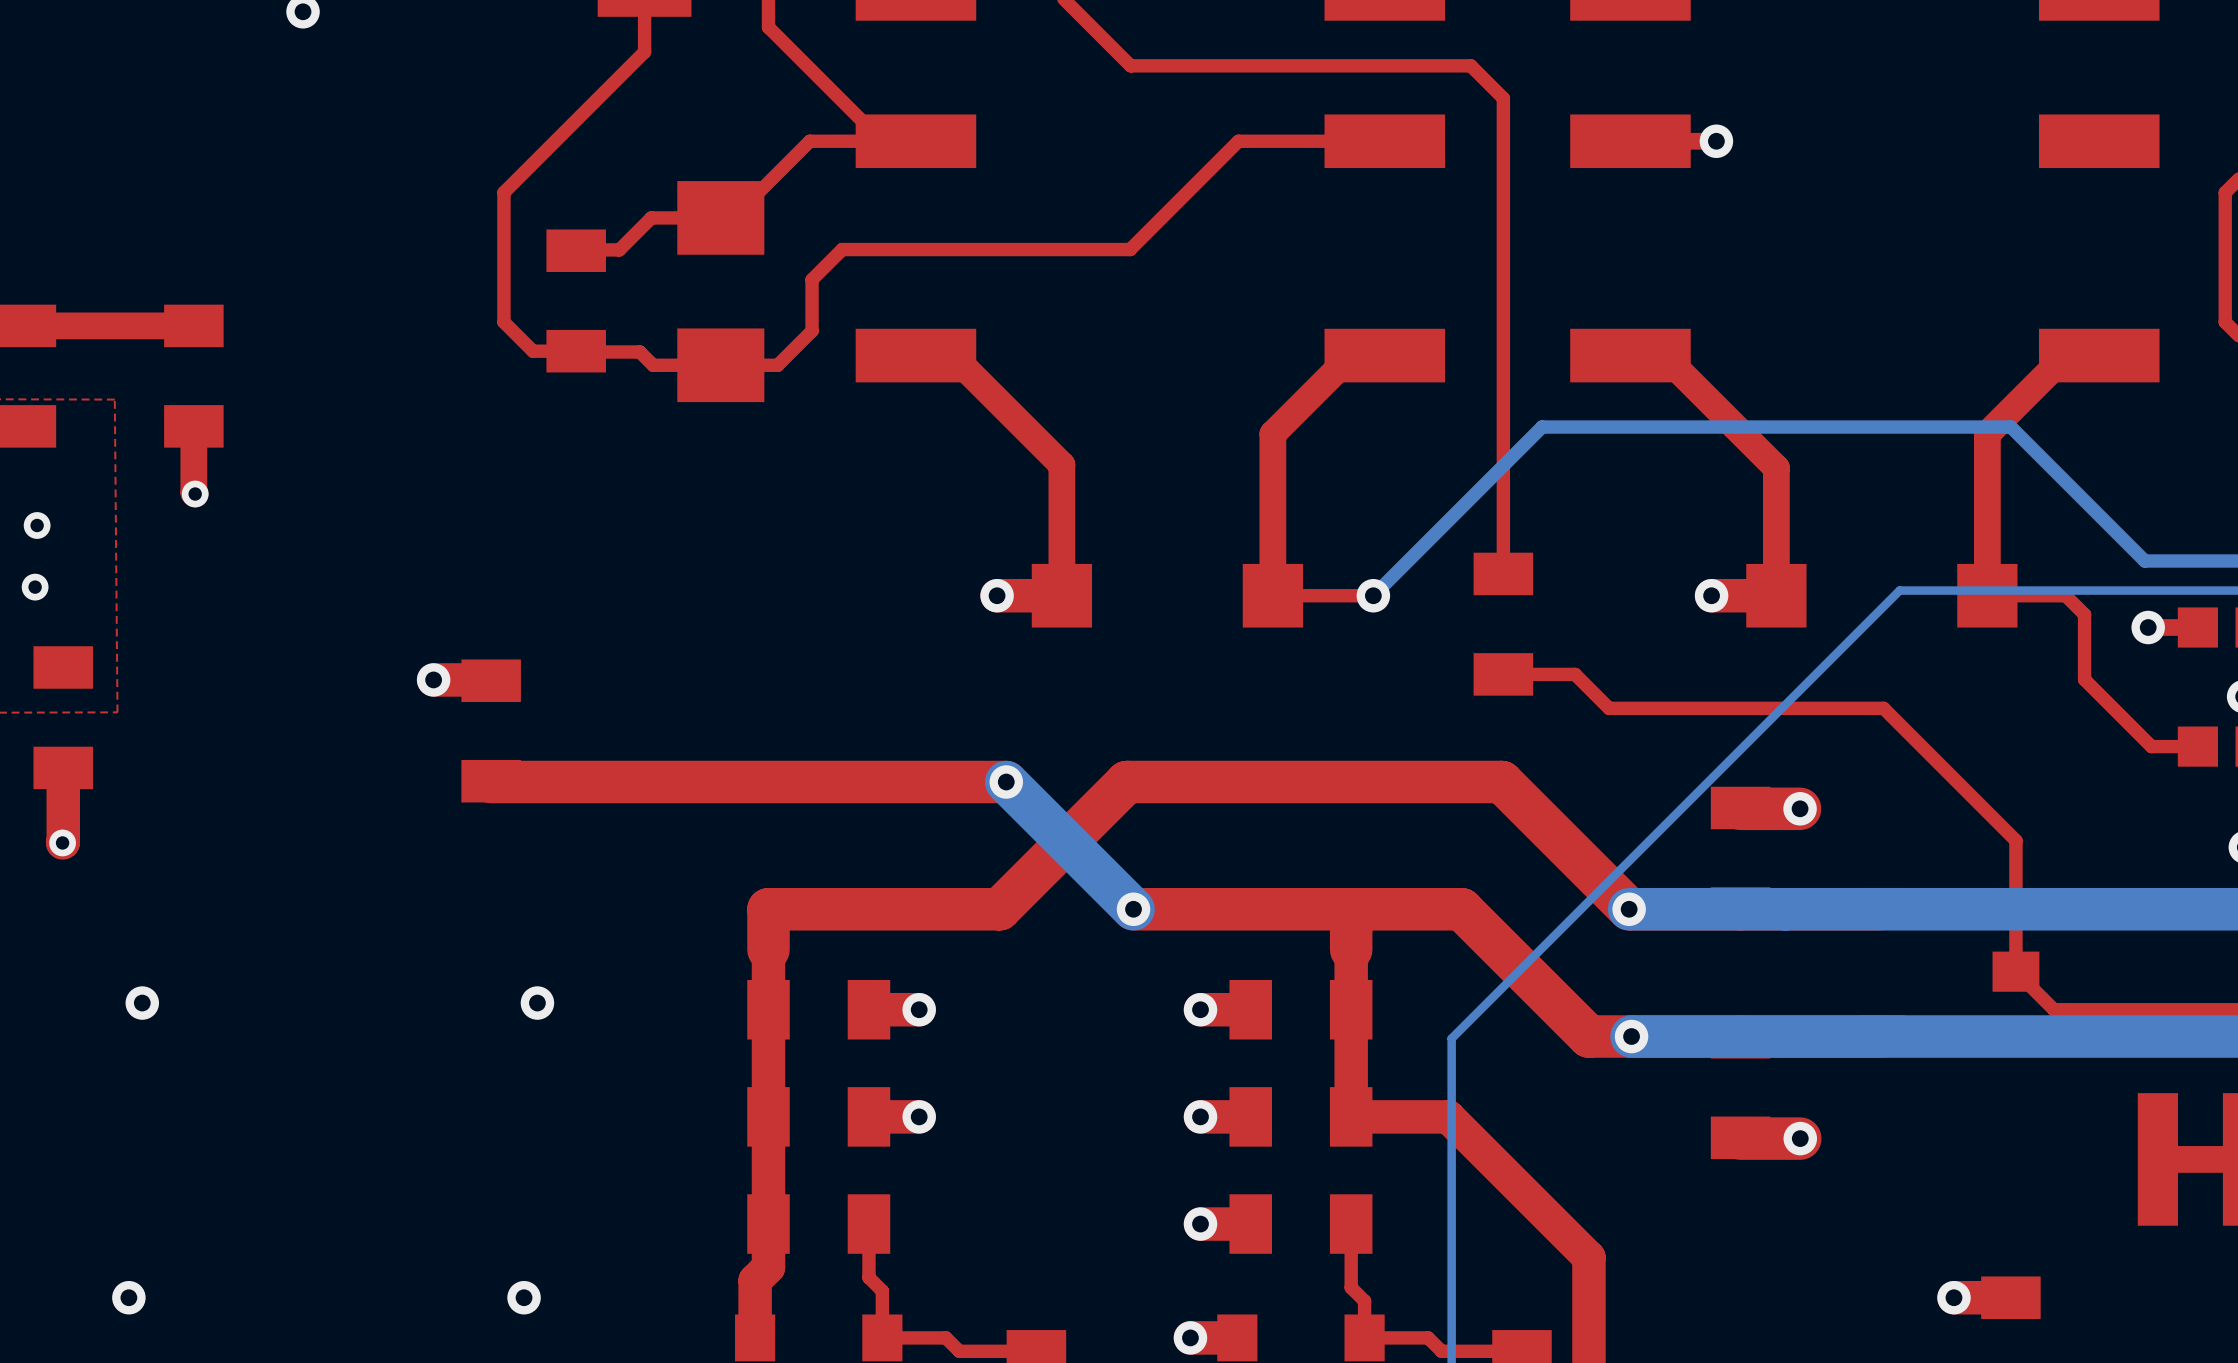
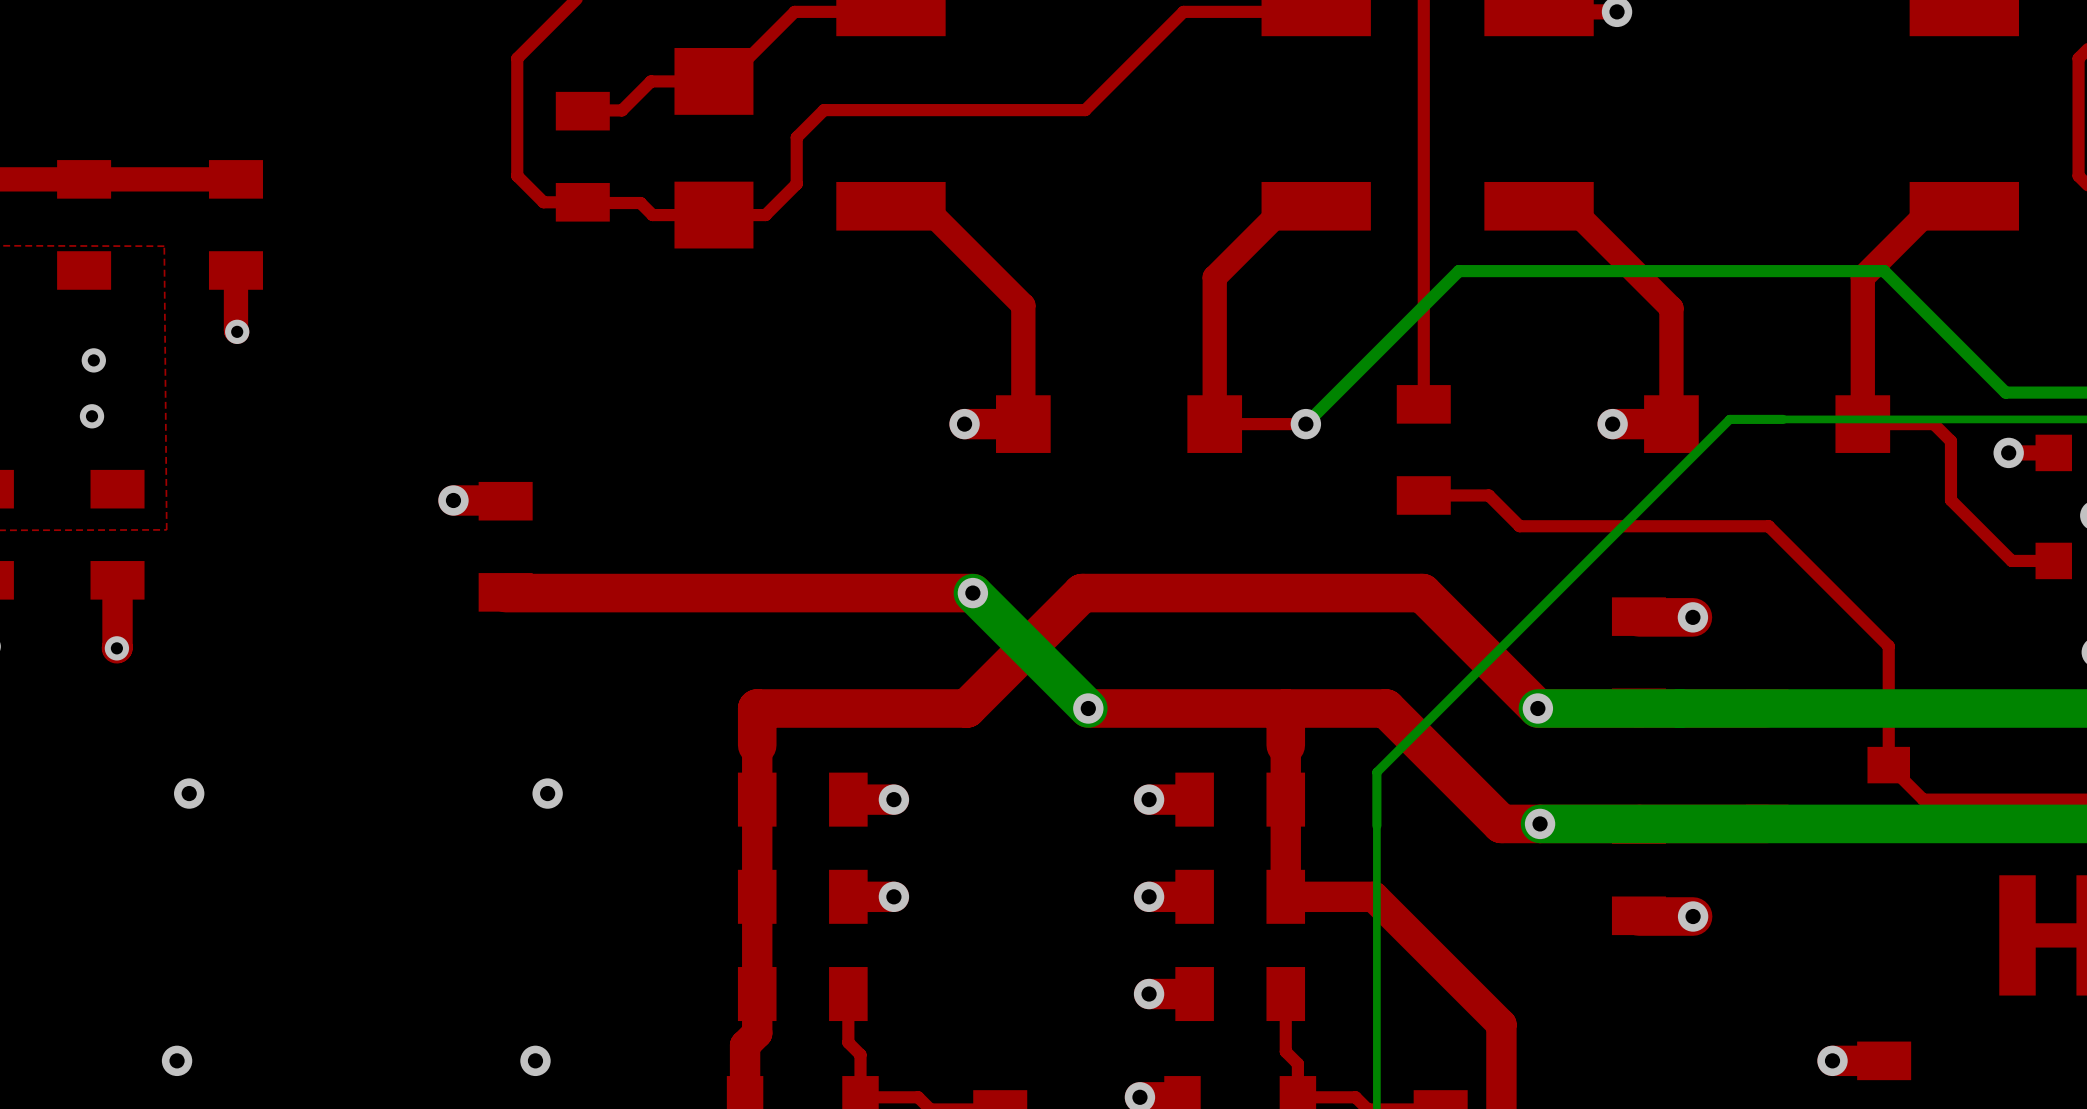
bottom track: (1899, 590) (1451, 1038) -> (1783, 419) (1729, 419) (1376, 772) (1376, 825)

